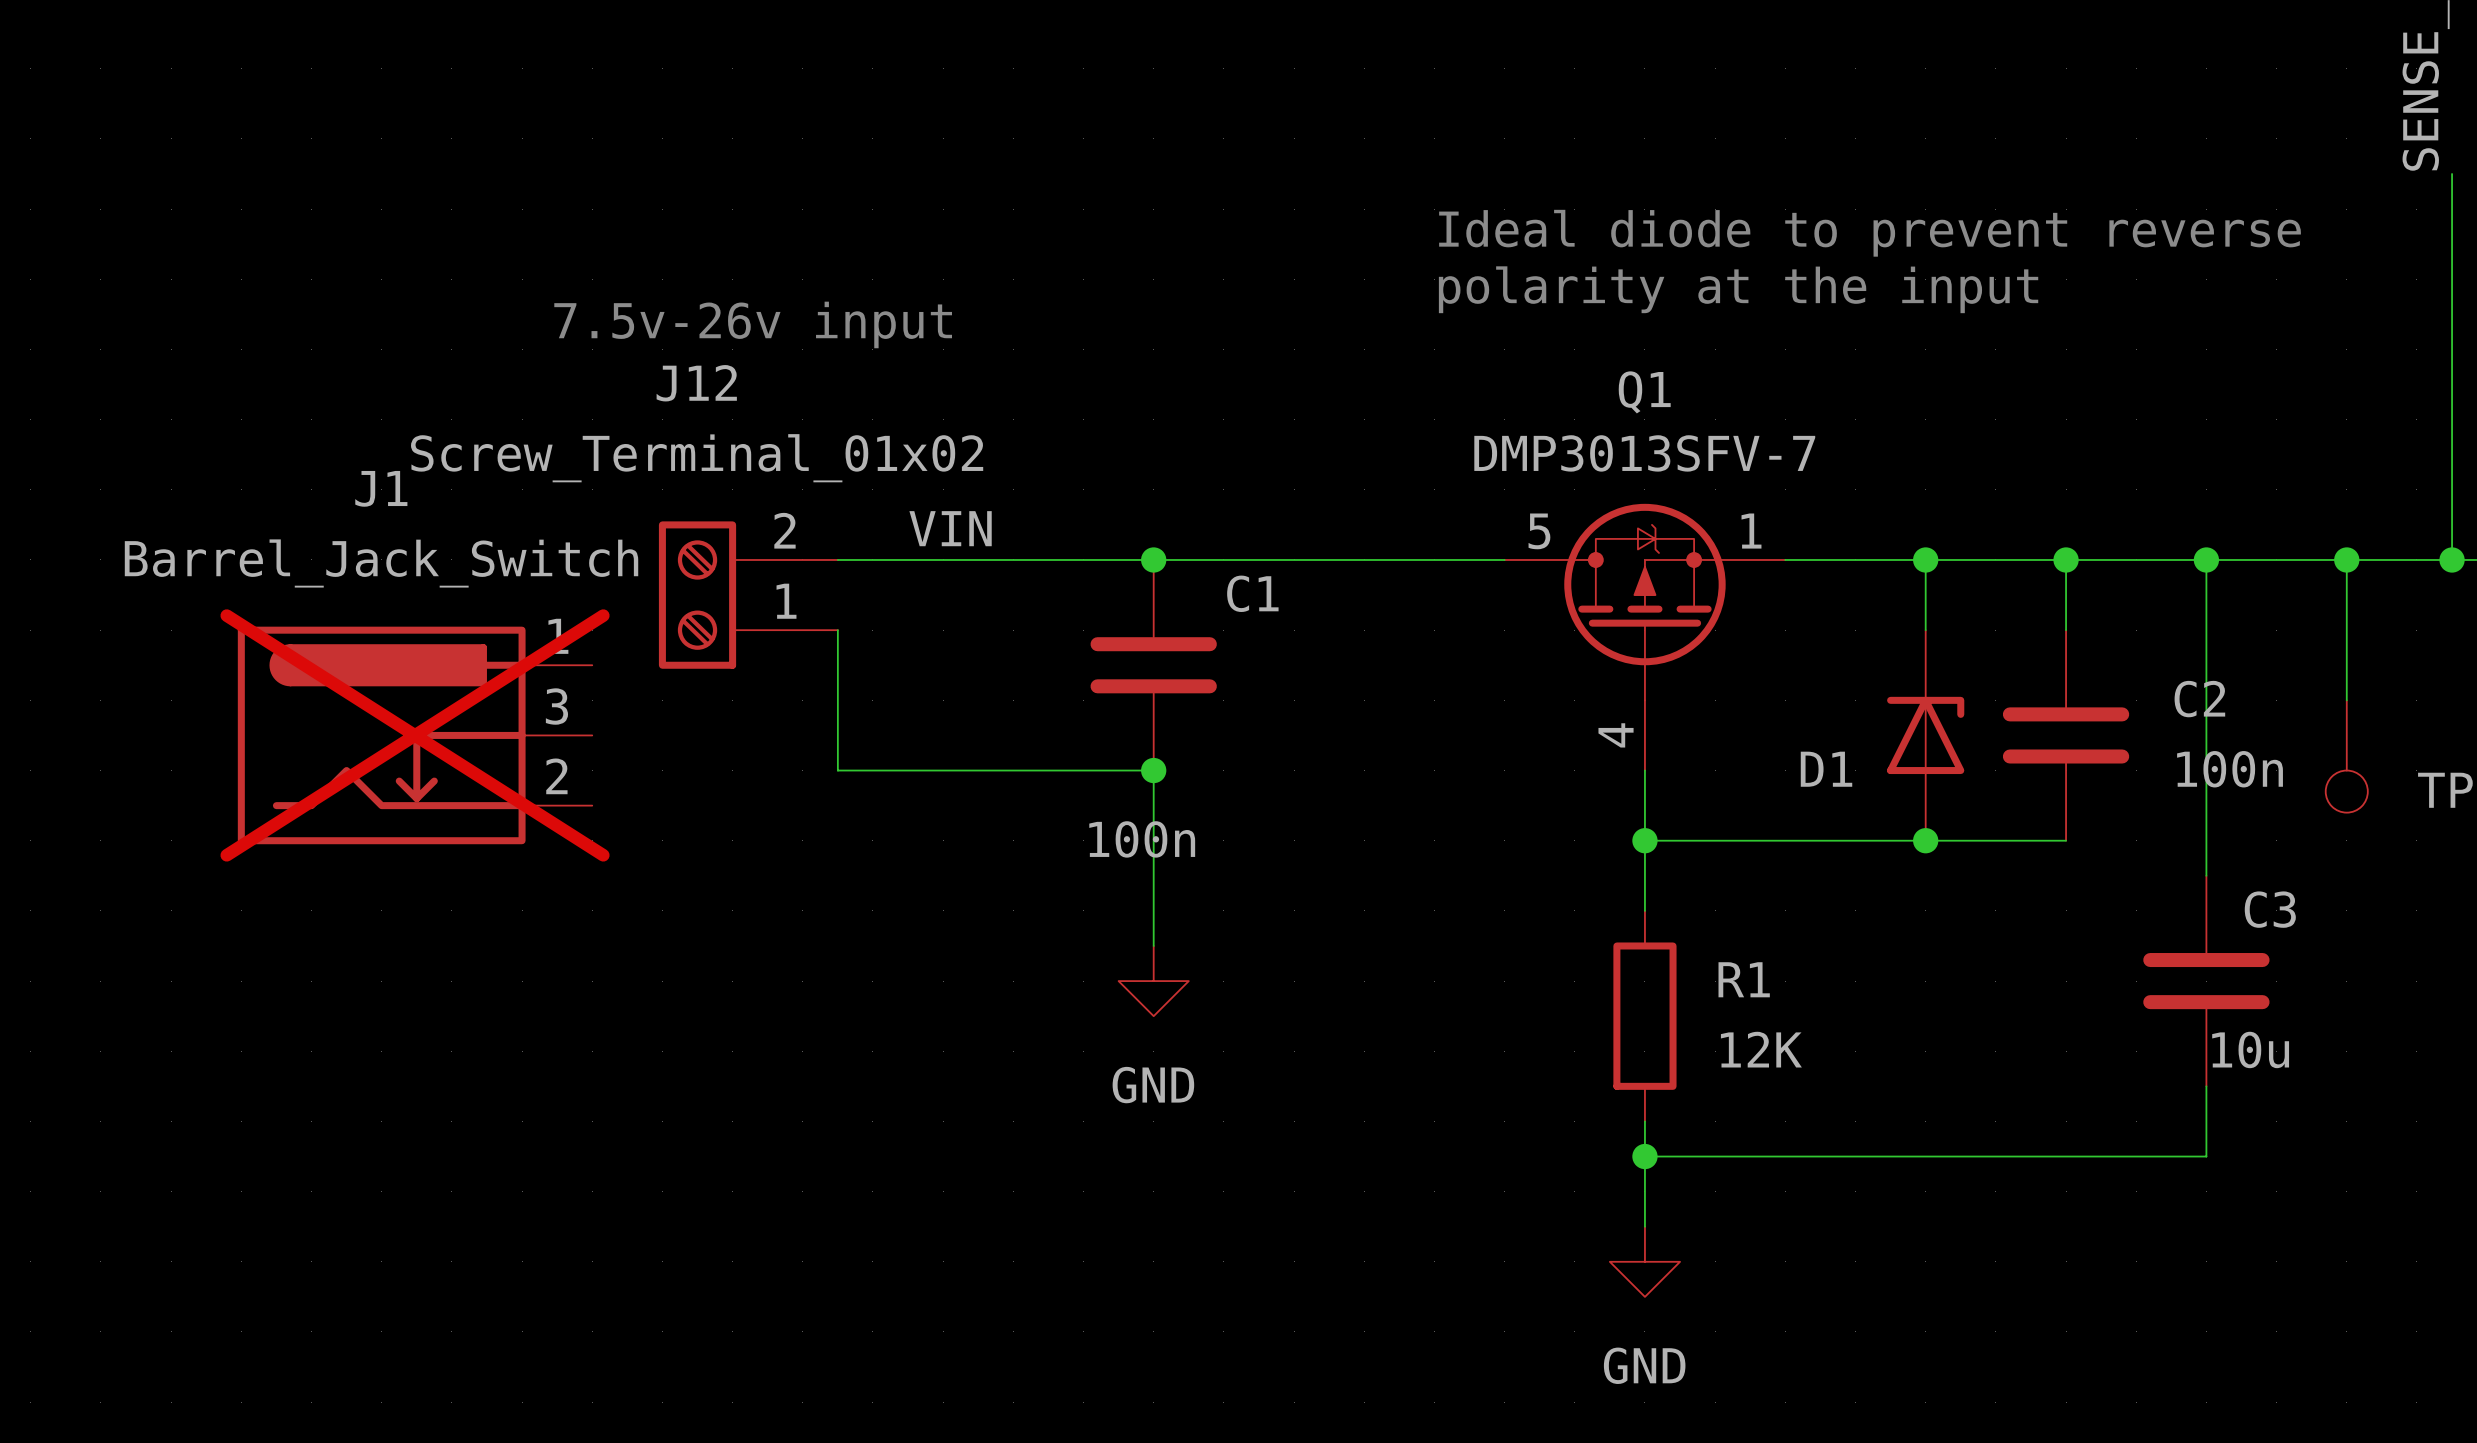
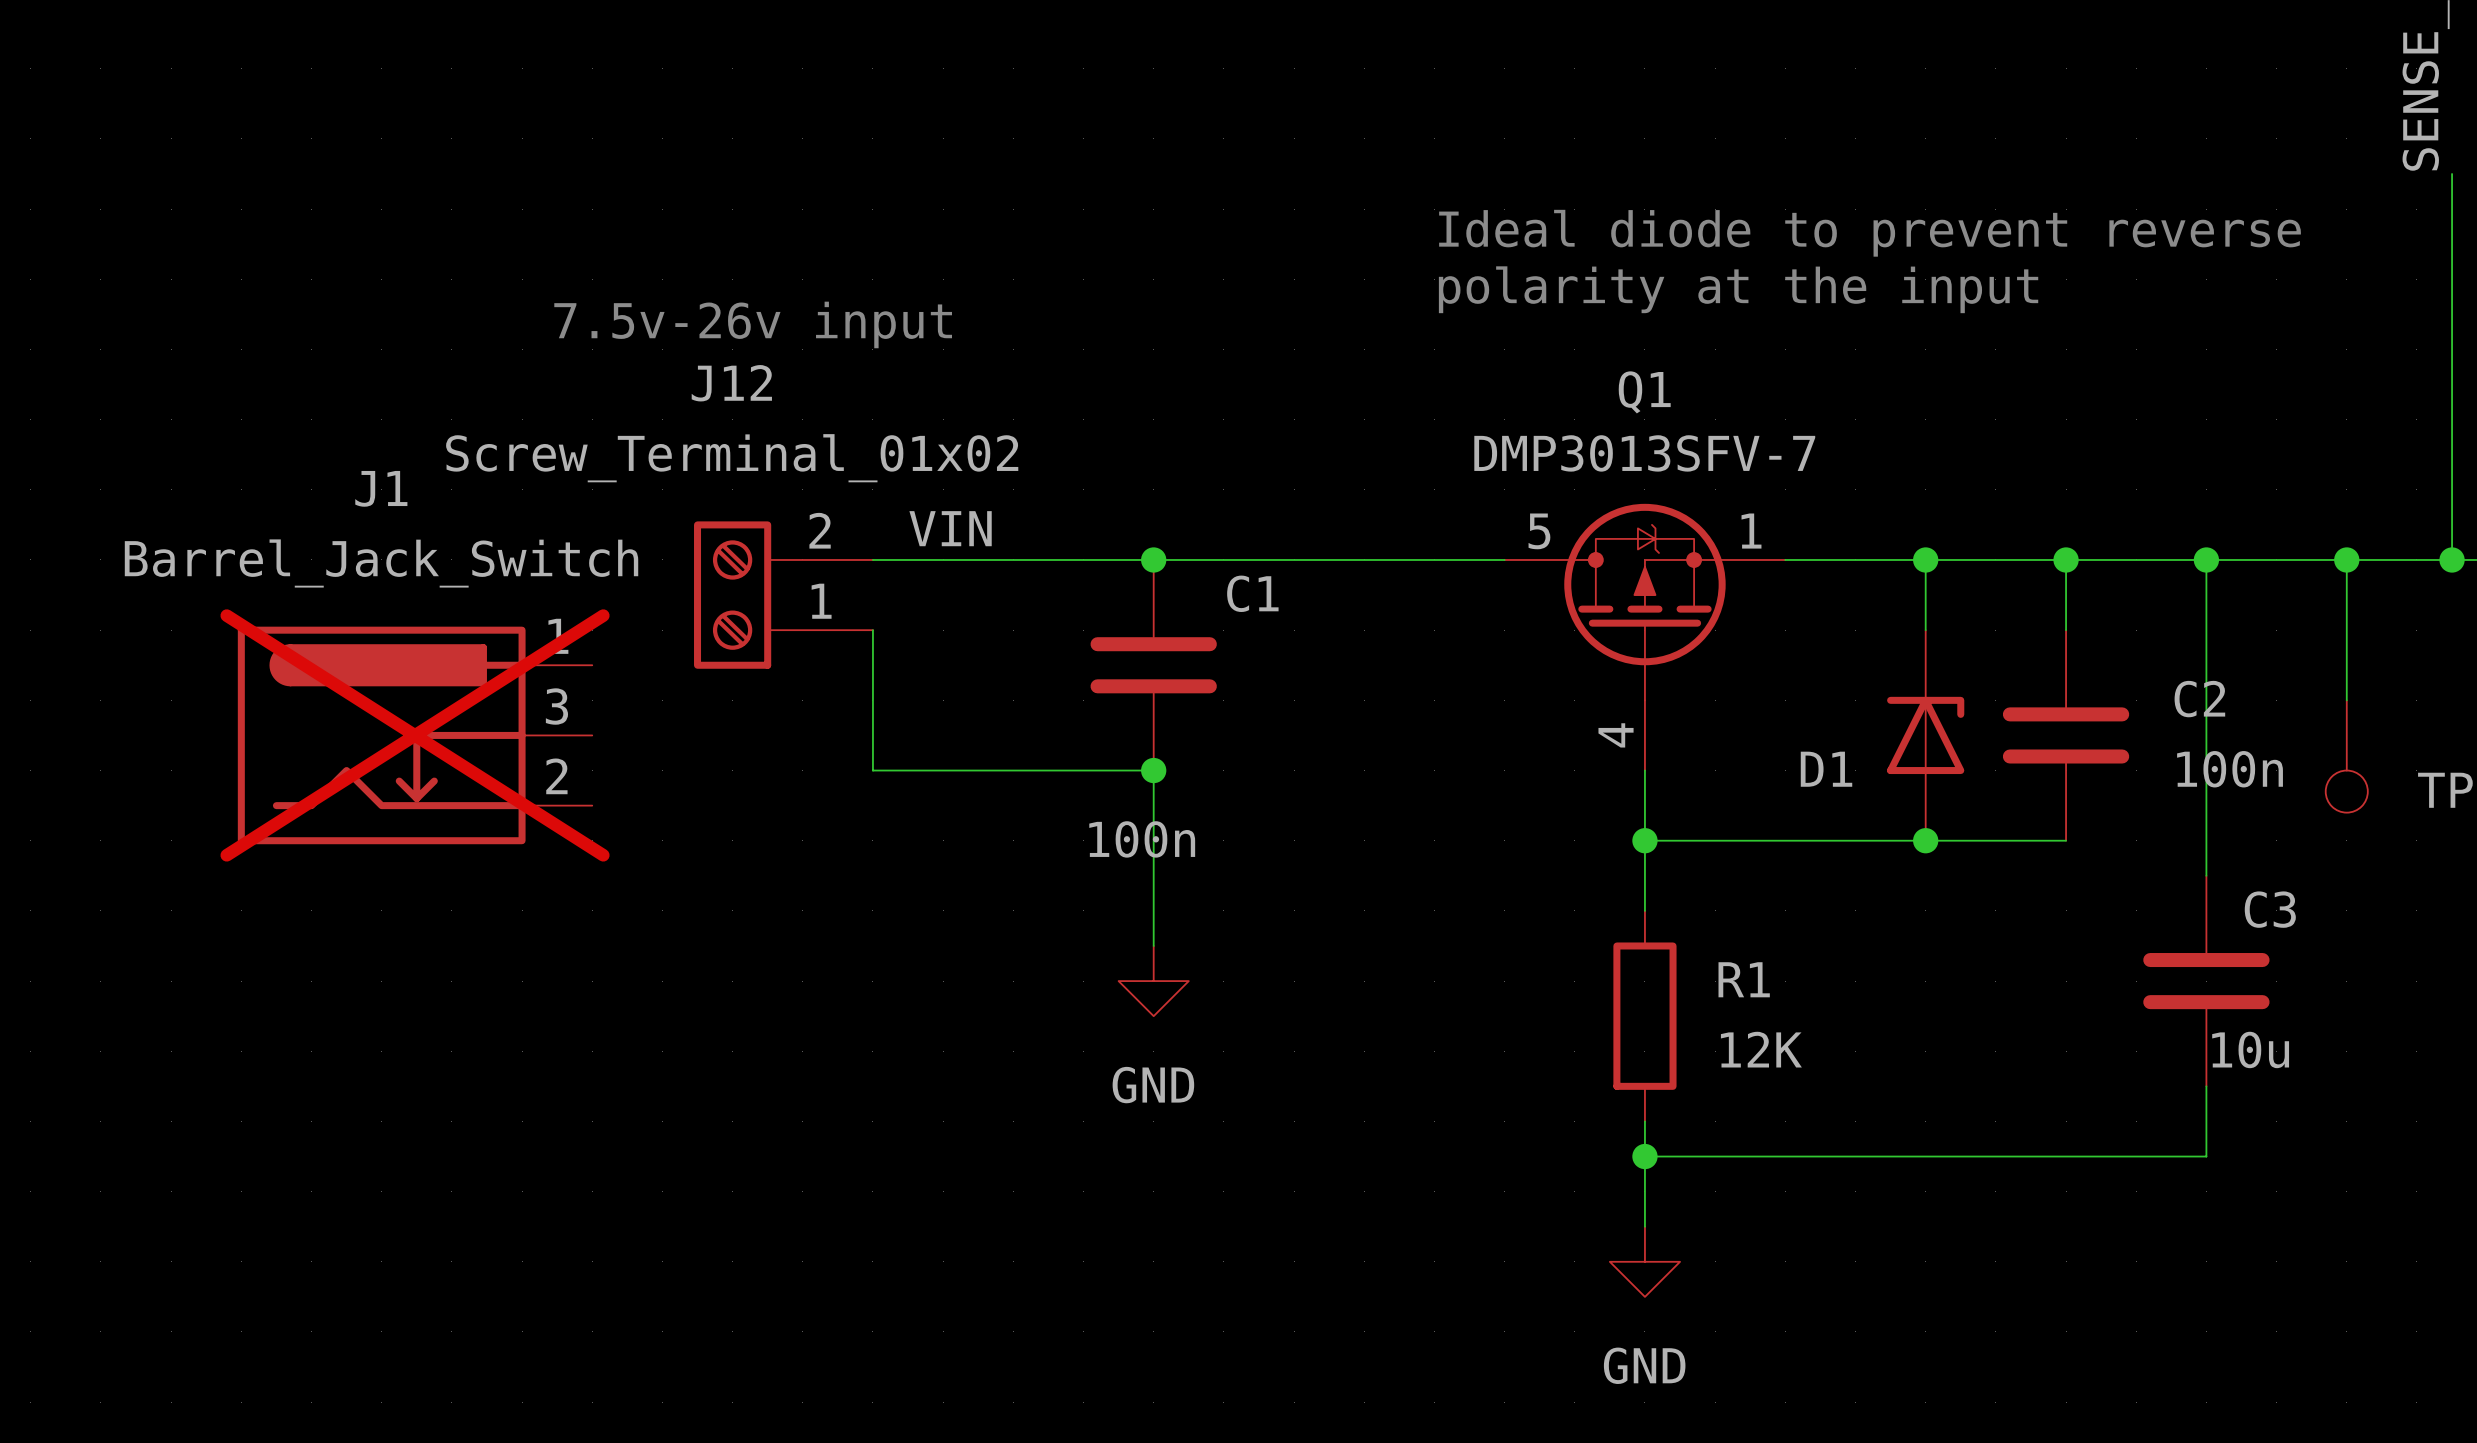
J12 position: (748, 595) -> (783, 595)
wire: (837, 630) (837, 770) (872, 770) -> (872, 630) (872, 770)

